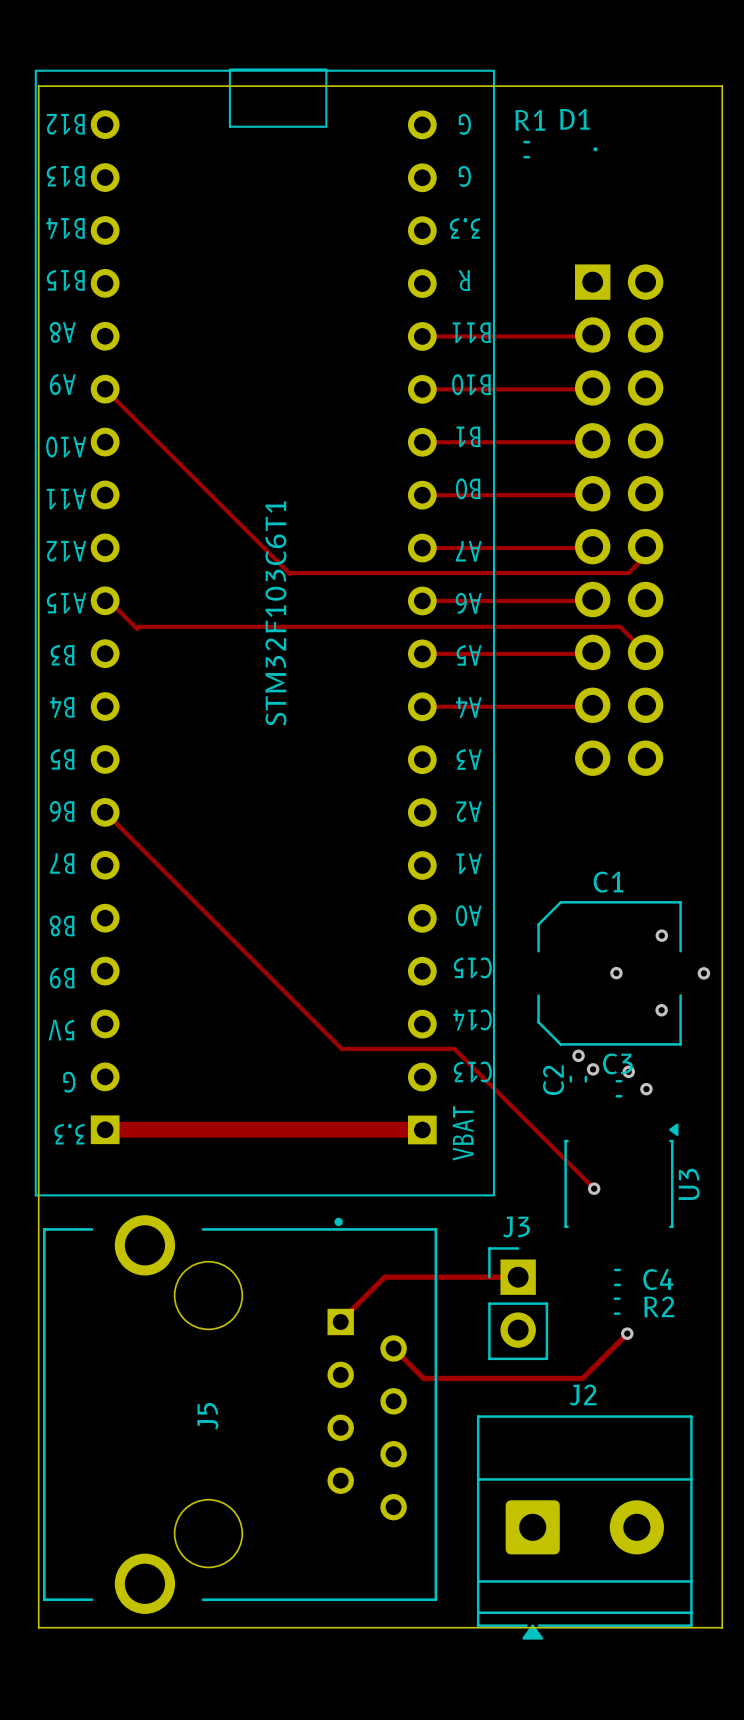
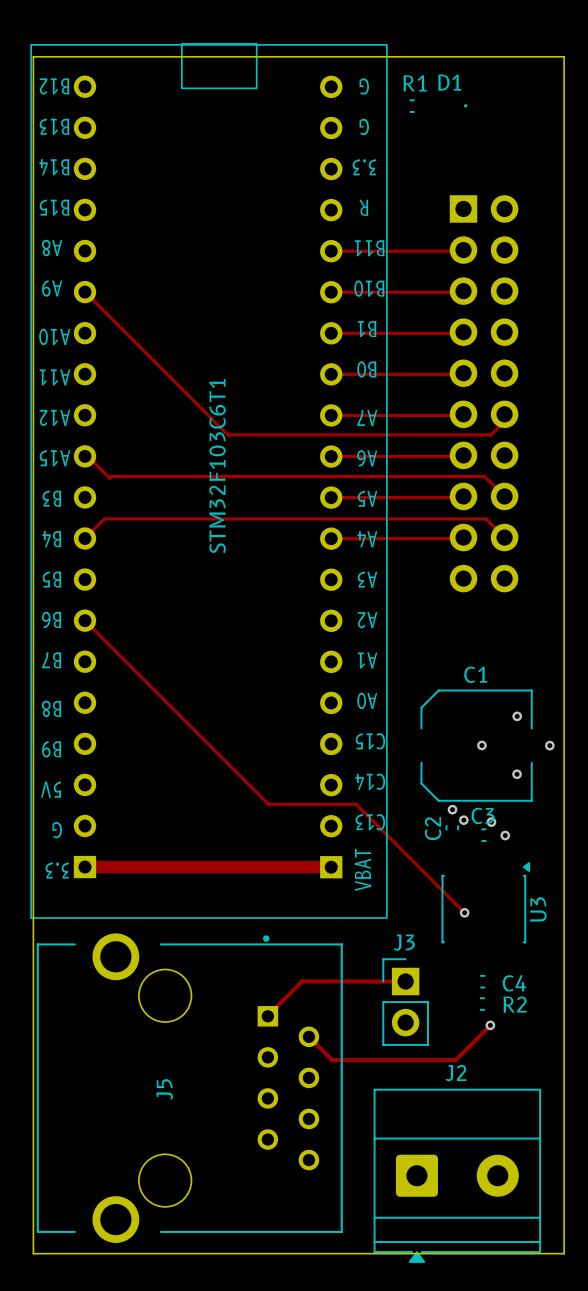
track: none -> (504, 537) (485, 518) (104, 518) (84, 538)

